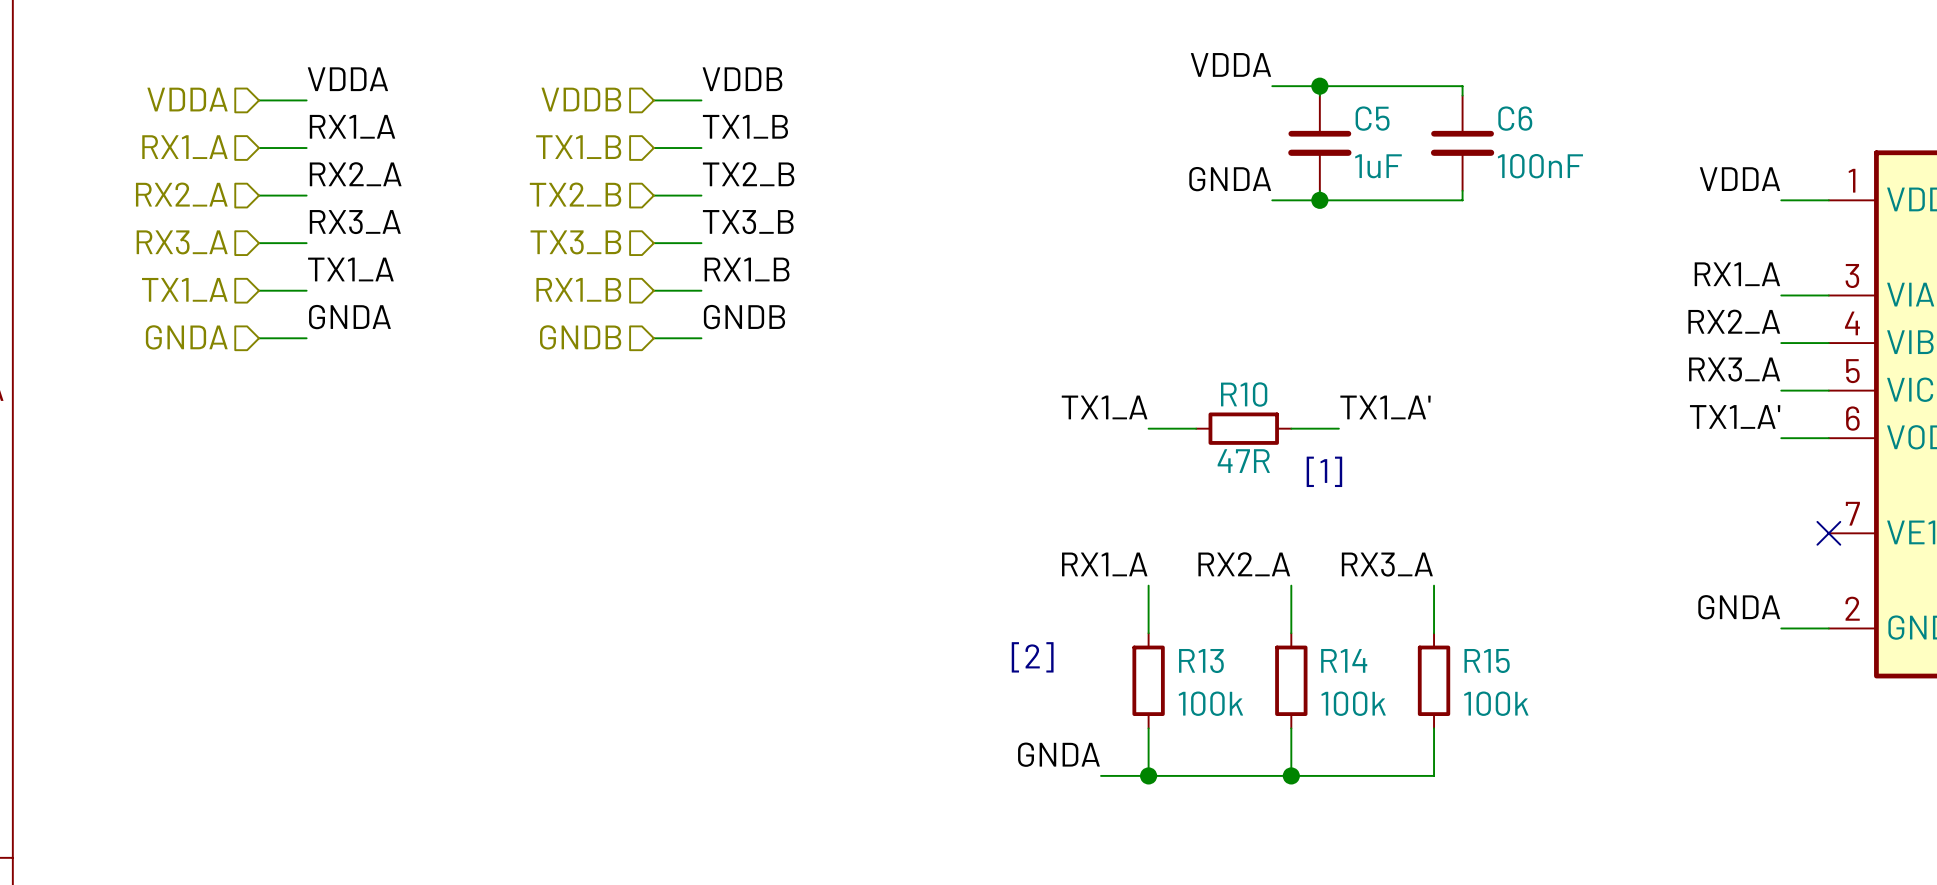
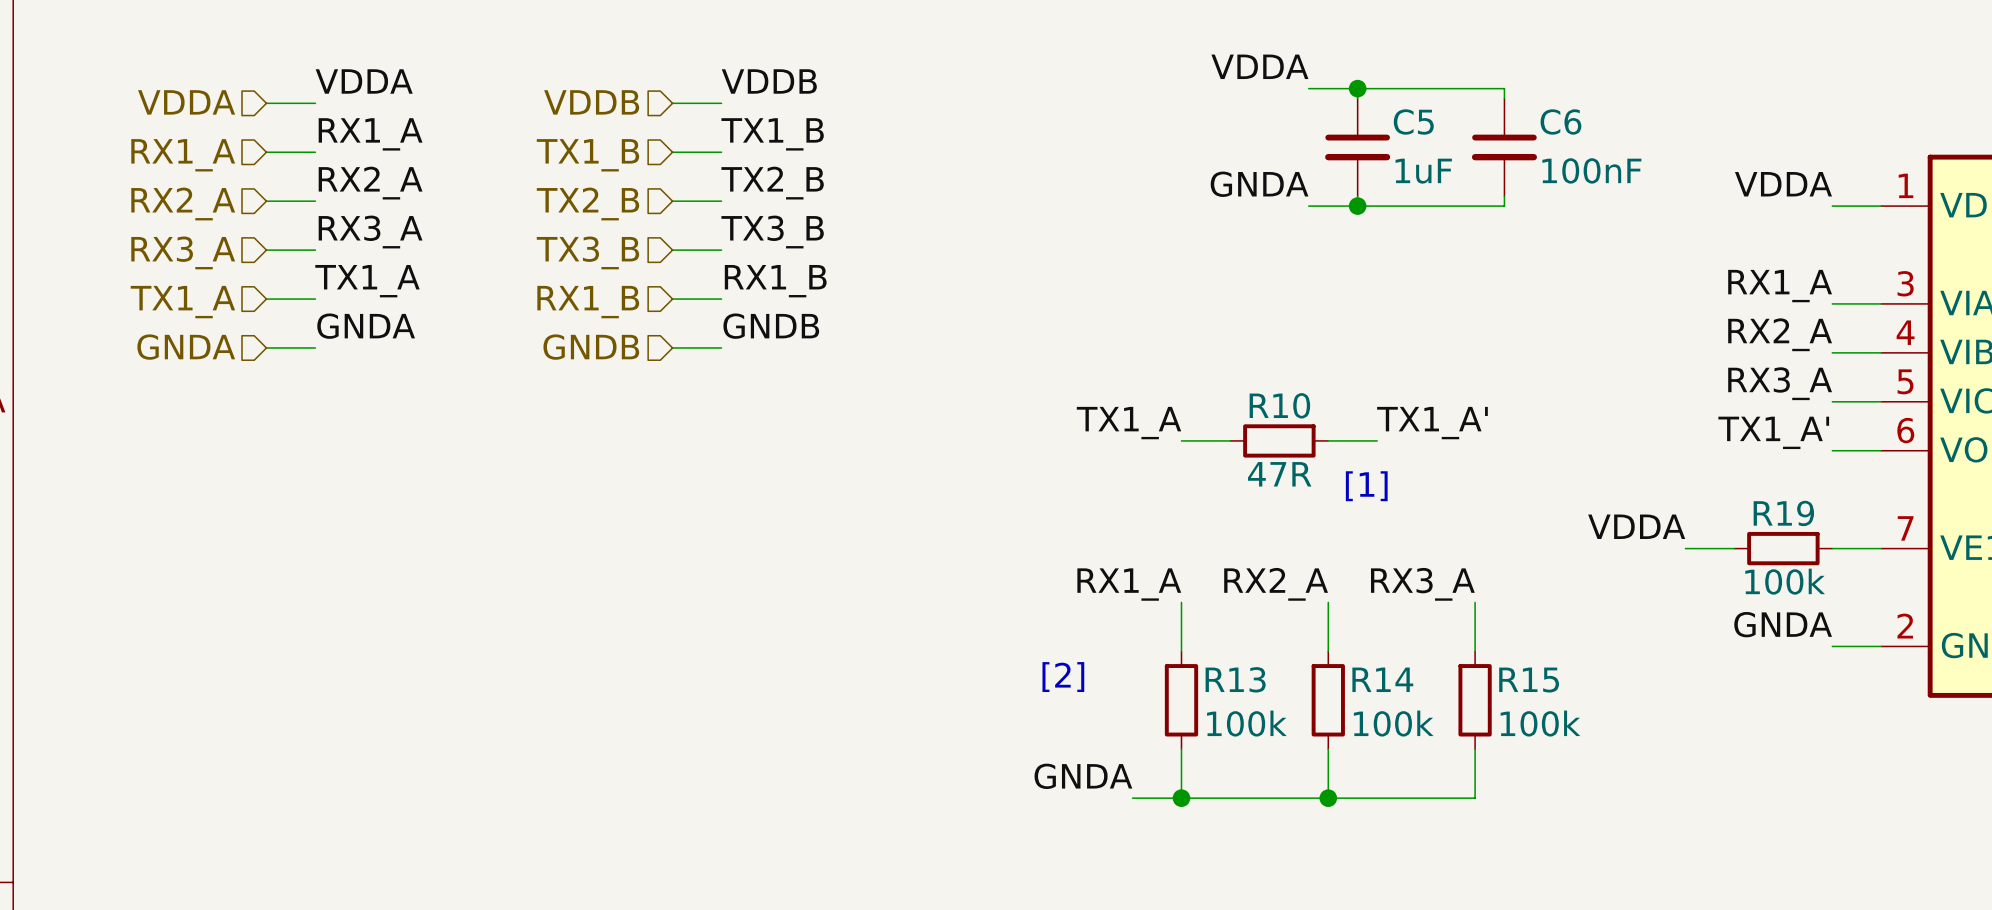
label: none -> VDDA (1636, 526)
wire: none -> (1685, 548) (1734, 548)
R19: none -> 100k (1783, 548)
wire: none -> (1832, 548) (1881, 548)
no-connect mark: (1828, 533) -> none

